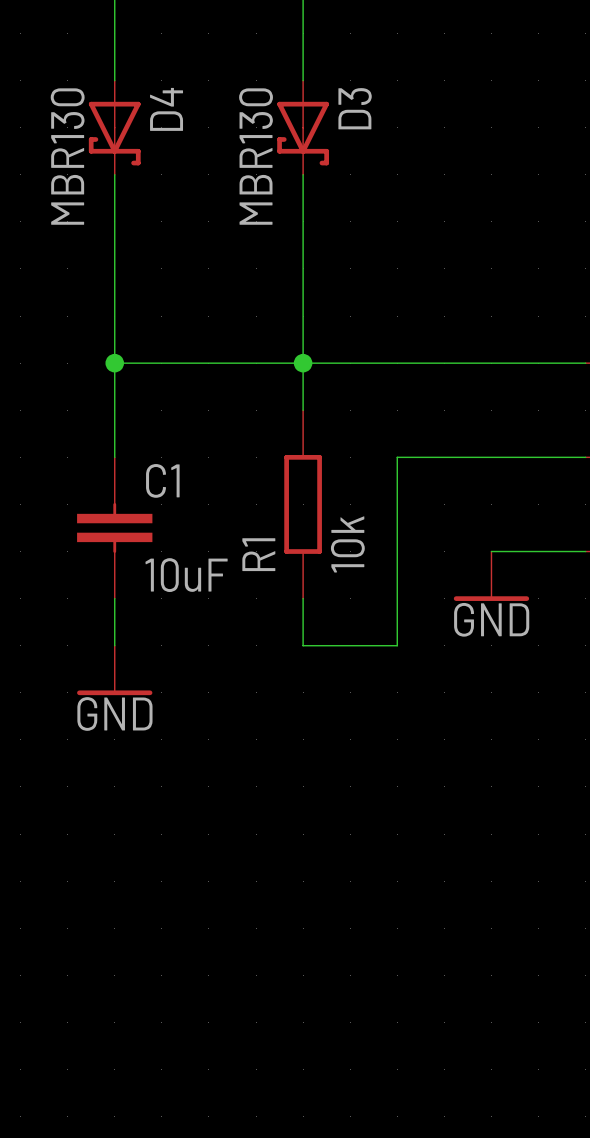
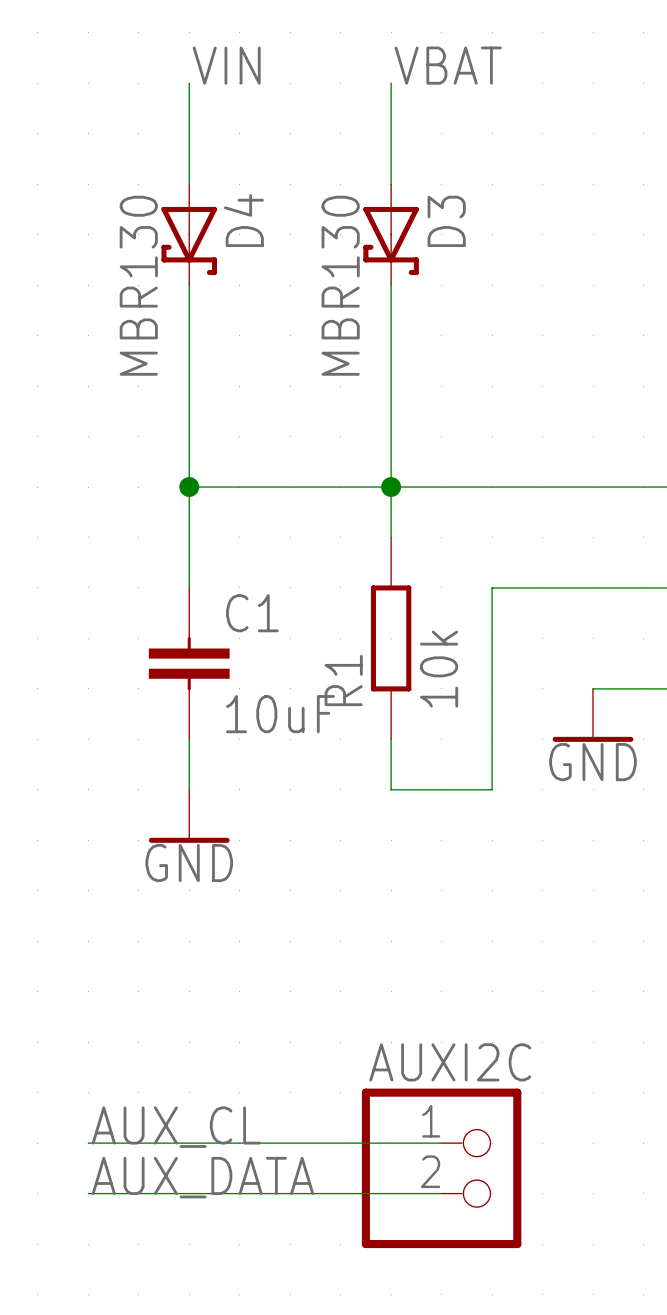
label: none -> AUX_CL (176, 1127)
wire: none -> (88, 1143) (441, 1143)
AUXI2C: none -> (441, 1168)
label: none -> AUX_DATA (202, 1177)
wire: none -> (88, 1193) (441, 1193)

